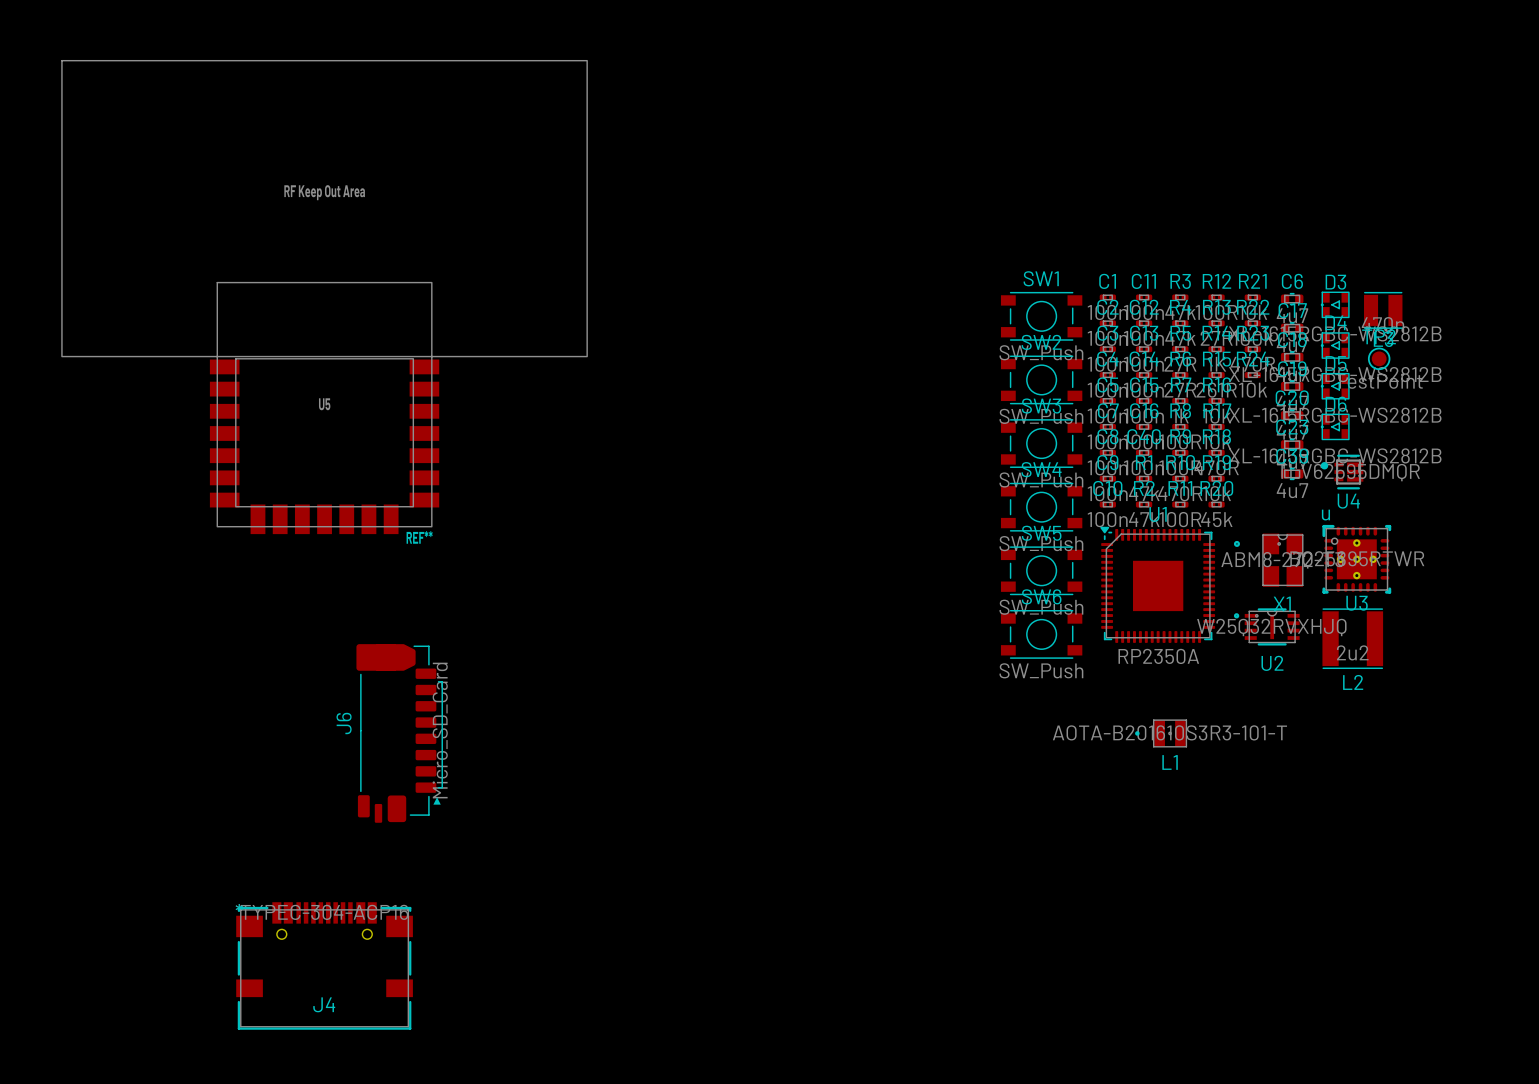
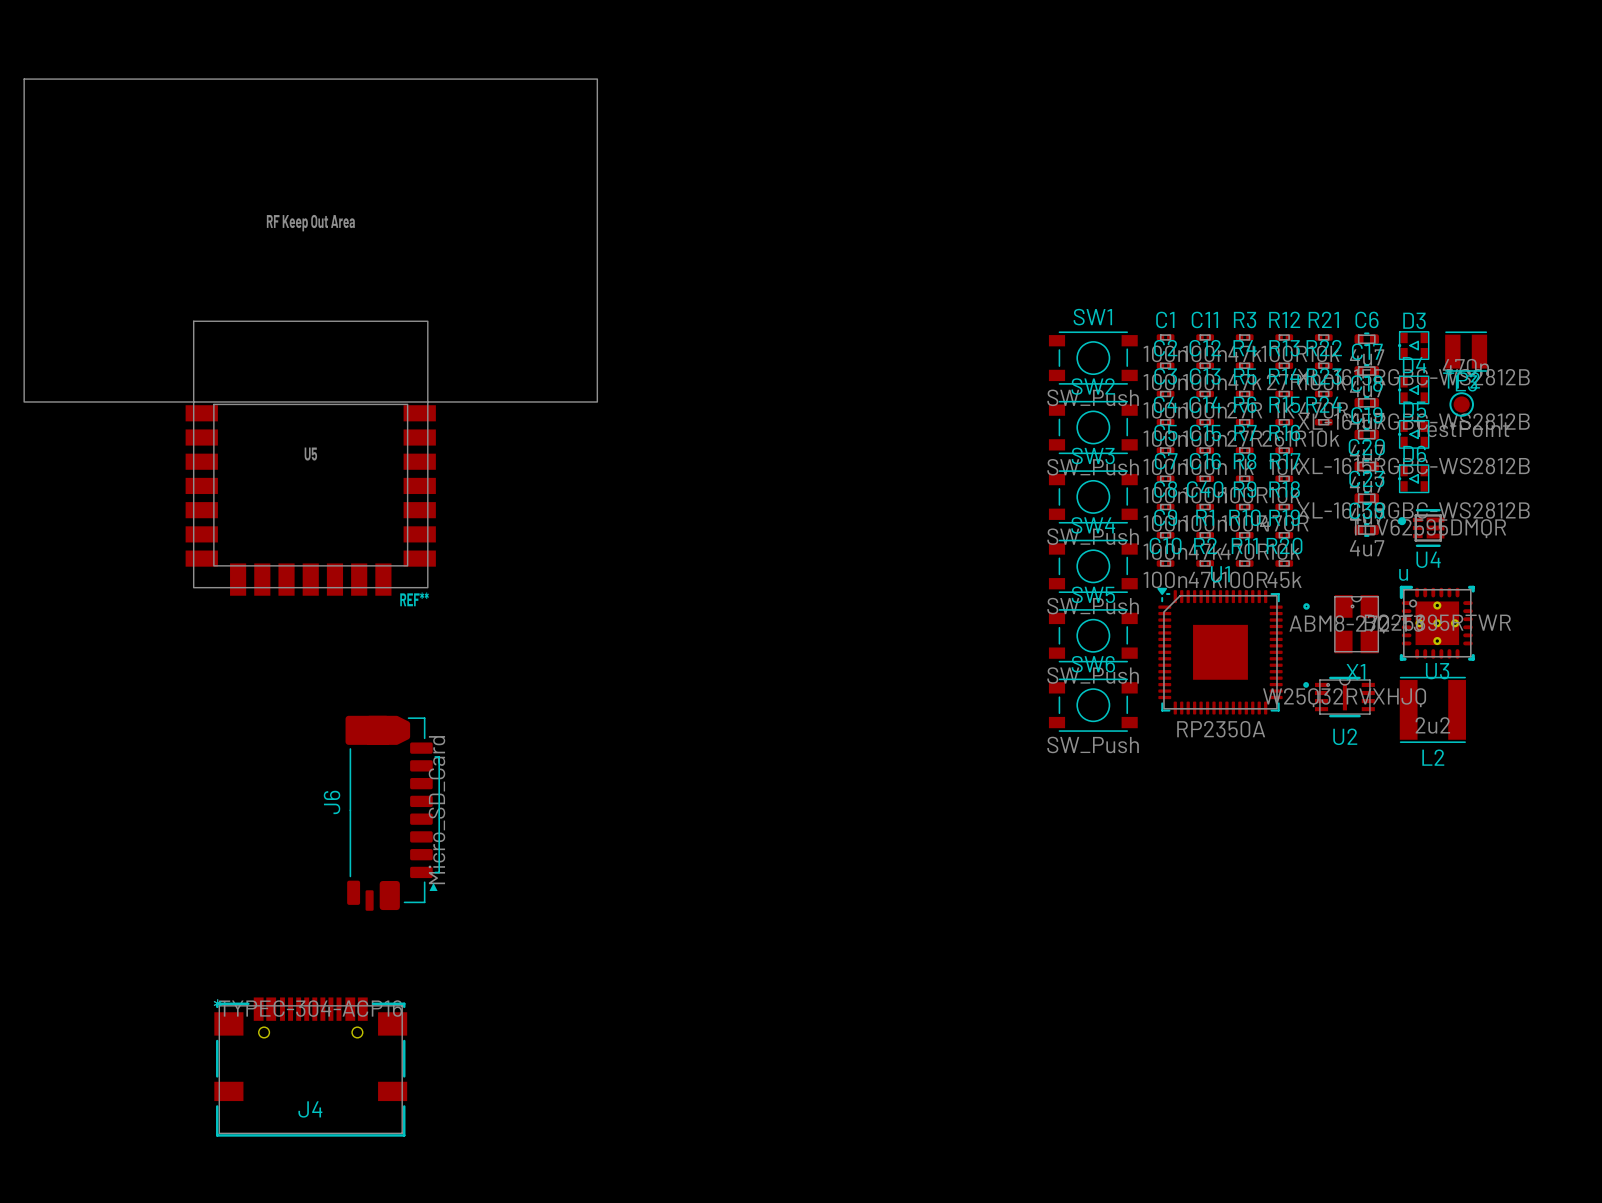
L1: AOTA-B201610S3R3-101-T (1160, 733) -> none

